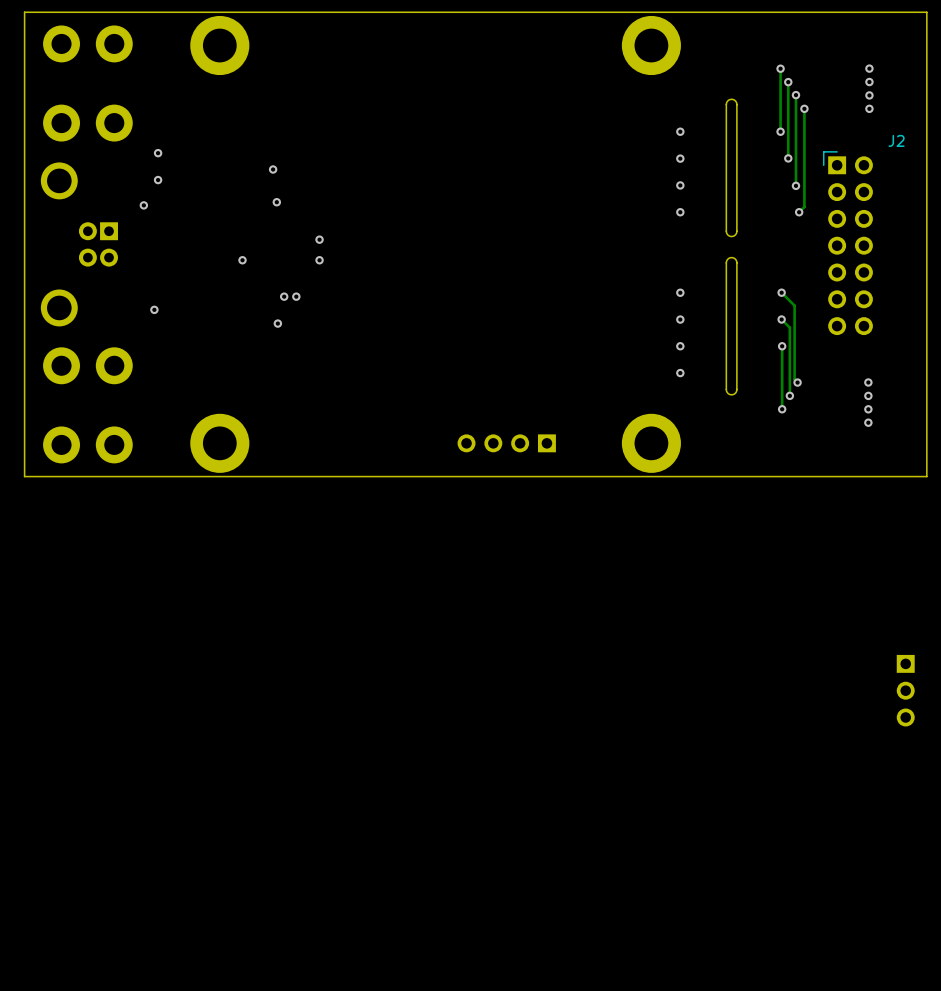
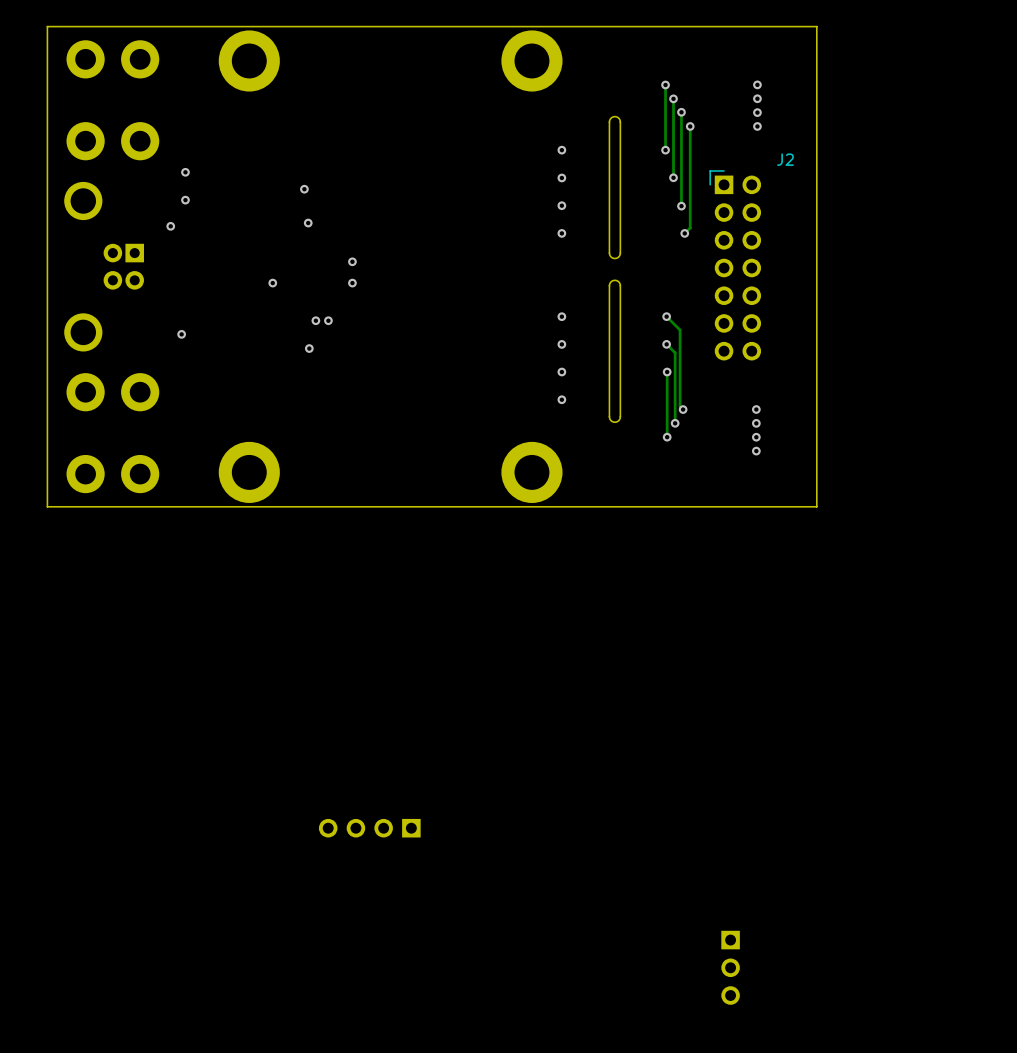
board edge: (768, 12) (926, 12) (926, 476) (768, 476) -> (816, 26) (816, 506)
part position: (651, 45) -> (531, 60)
via: none -> (665, 84)
via: none -> (757, 84)
track: (780, 68) (780, 131) -> (665, 84) (665, 150)
via: (780, 68) -> none
via: (869, 68) -> none
via: none -> (673, 98)
via: none -> (757, 98)
track: (788, 82) (788, 158) -> (673, 98) (673, 177)
via: (788, 82) -> none
via: (869, 82) -> none
via: none -> (681, 112)
via: none -> (757, 112)
track: (795, 95) (795, 185) -> (681, 112) (681, 206)
via: (795, 95) -> none
via: (869, 95) -> none
board edge: (736, 104) (736, 231) (735, 234) (731, 236) (727, 234) (726, 231) (726, 104) (727, 100) (731, 99) (735, 100) (736, 104) -> (620, 122) (620, 253) (618, 256) (614, 258) (611, 256) (609, 253) (609, 122) (611, 118) (614, 116) (618, 118) (620, 122)
via: none -> (690, 126)
via: none -> (757, 126)
track: (804, 108) (804, 206) (799, 212) -> (690, 126) (690, 227) (684, 233)
via: (804, 108) -> none
via: (869, 108) -> none
via: none -> (561, 150)
via: none -> (665, 150)
via: (680, 131) -> none
via: (780, 131) -> none
via: none -> (561, 177)
via: none -> (673, 177)
via: (680, 158) -> none
via: (788, 158) -> none
via: none -> (561, 205)
via: none -> (681, 206)
via: (680, 185) -> none
via: (795, 185) -> none
via: none -> (561, 233)
via: none -> (684, 233)
via: (680, 212) -> none
via: (799, 212) -> none
J2 position: (848, 243) -> (735, 265)
board edge: (736, 262) (736, 389) (735, 393) (731, 394) (727, 393) (726, 389) (726, 262) (727, 259) (731, 257) (735, 259) (736, 262) -> (620, 285) (620, 416) (618, 420) (614, 422) (611, 420) (609, 416) (609, 285) (611, 281) (614, 280) (618, 281) (620, 285)
via: none -> (561, 316)
via: none -> (666, 316)
via: (680, 292) -> none
track: (781, 292) (794, 305) (794, 379) (797, 382) -> (666, 316) (680, 330) (680, 406) (683, 409)
via: (781, 292) -> none
via: none -> (561, 344)
via: none -> (666, 344)
via: (680, 319) -> none
track: (781, 319) (789, 327) (789, 395) -> (666, 344) (675, 352) (675, 423)
via: (781, 319) -> none
via: none -> (561, 372)
via: none -> (667, 372)
via: (680, 346) -> none
track: (782, 346) (782, 409) -> (667, 372) (667, 437)
via: (782, 346) -> none
via: none -> (561, 399)
via: (680, 373) -> none
via: none -> (683, 409)
via: none -> (756, 409)
via: (797, 382) -> none
via: (868, 382) -> none
via: none -> (675, 423)
via: none -> (756, 423)
via: (789, 395) -> none
via: (868, 395) -> none
via: none -> (667, 437)
via: none -> (756, 437)
via: (782, 409) -> none
via: (868, 409) -> none
via: none -> (756, 451)
via: (868, 422) -> none
part: (506, 443) -> none
part position: (651, 443) -> (531, 472)
part: (905, 690) -> none
part: none -> (369, 828)
part: none -> (730, 967)

